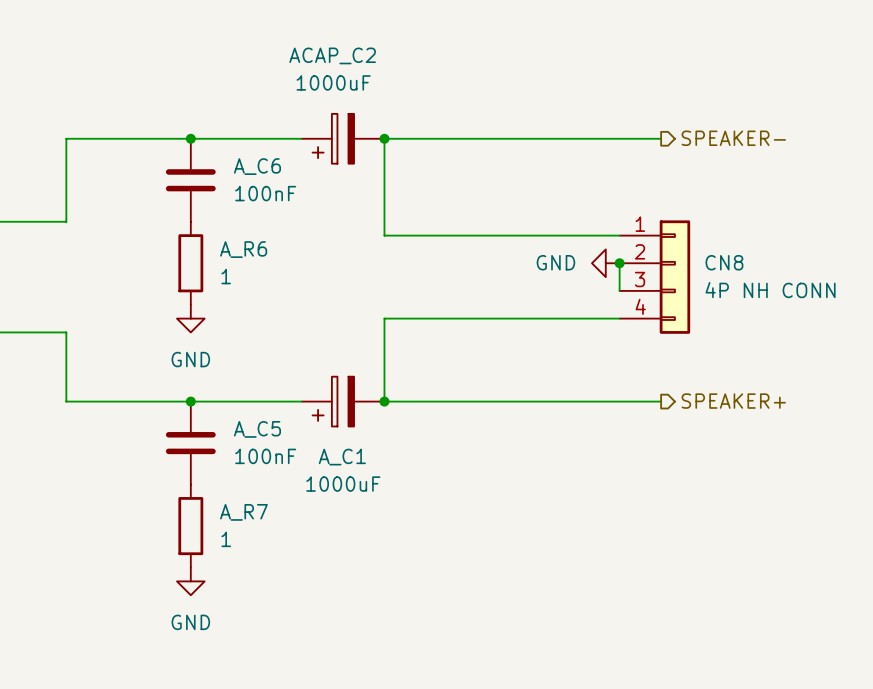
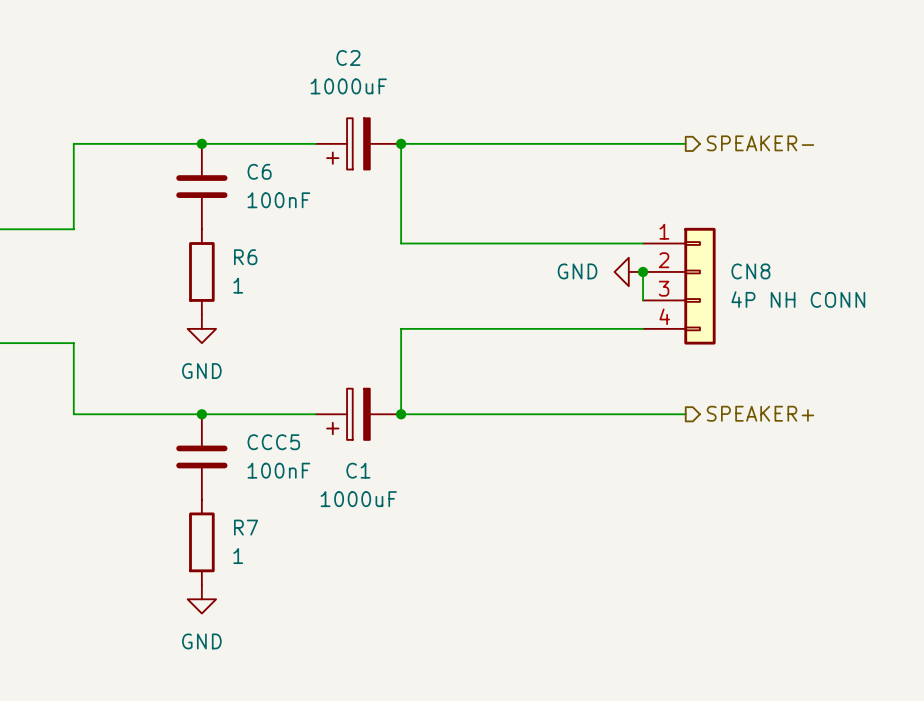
ACAP_C2 name: ACAP_C2 (332, 55) -> C2 (348, 57)
A_C6 name: A_C6 (257, 166) -> C6 (259, 171)
A_R6 name: A_R6 (243, 249) -> R6 (245, 257)
A_C5 name: A_C5 (257, 429) -> CCC5 (273, 442)
A_C1 name: A_C1 (342, 457) -> C1 (358, 470)
A_R7 name: A_R7 (243, 512) -> R7 (246, 527)

